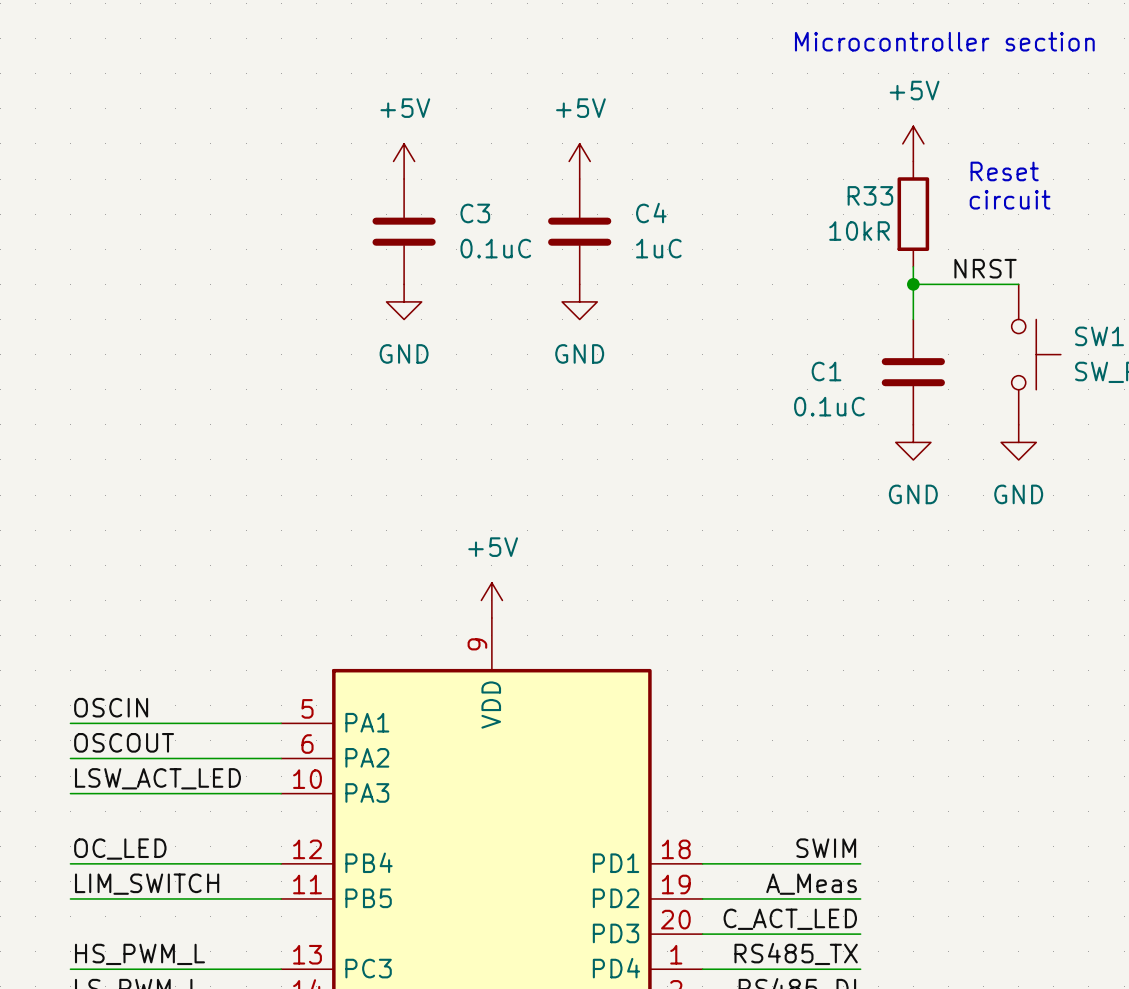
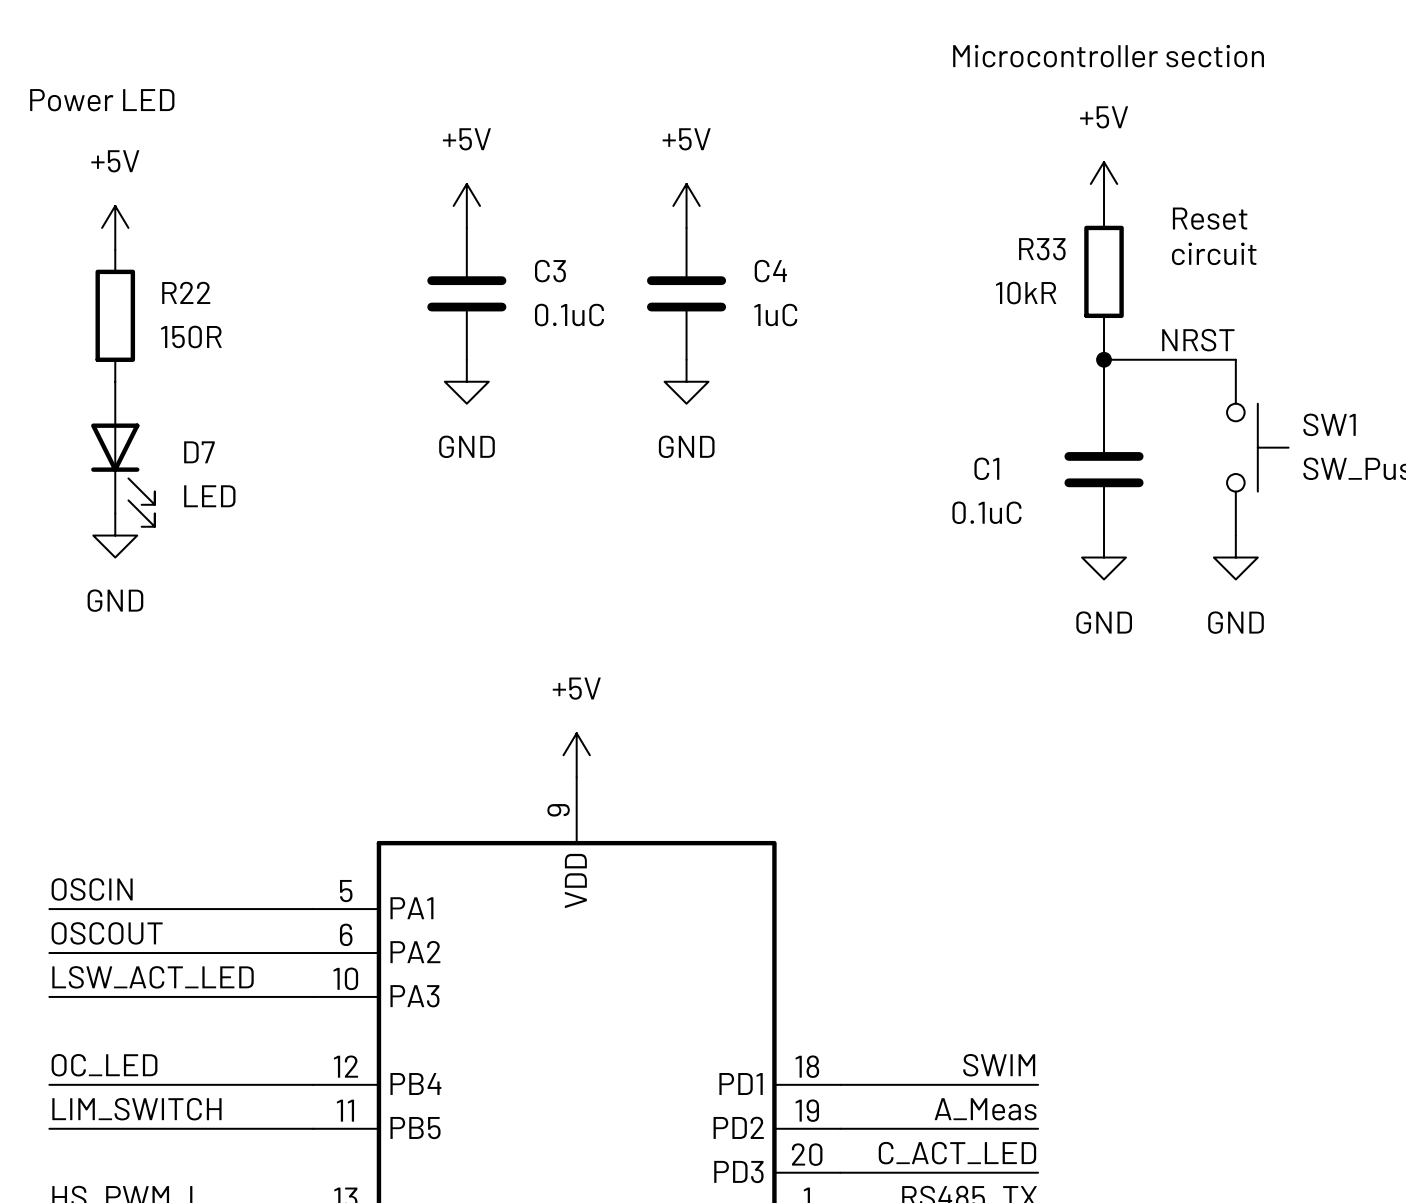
text: none -> Power LED (102, 100)
power symbol: none -> +5V (115, 227)
R22: none -> 150R (115, 315)
D7: none -> LED (122, 454)
power symbol: none -> GND (115, 535)

